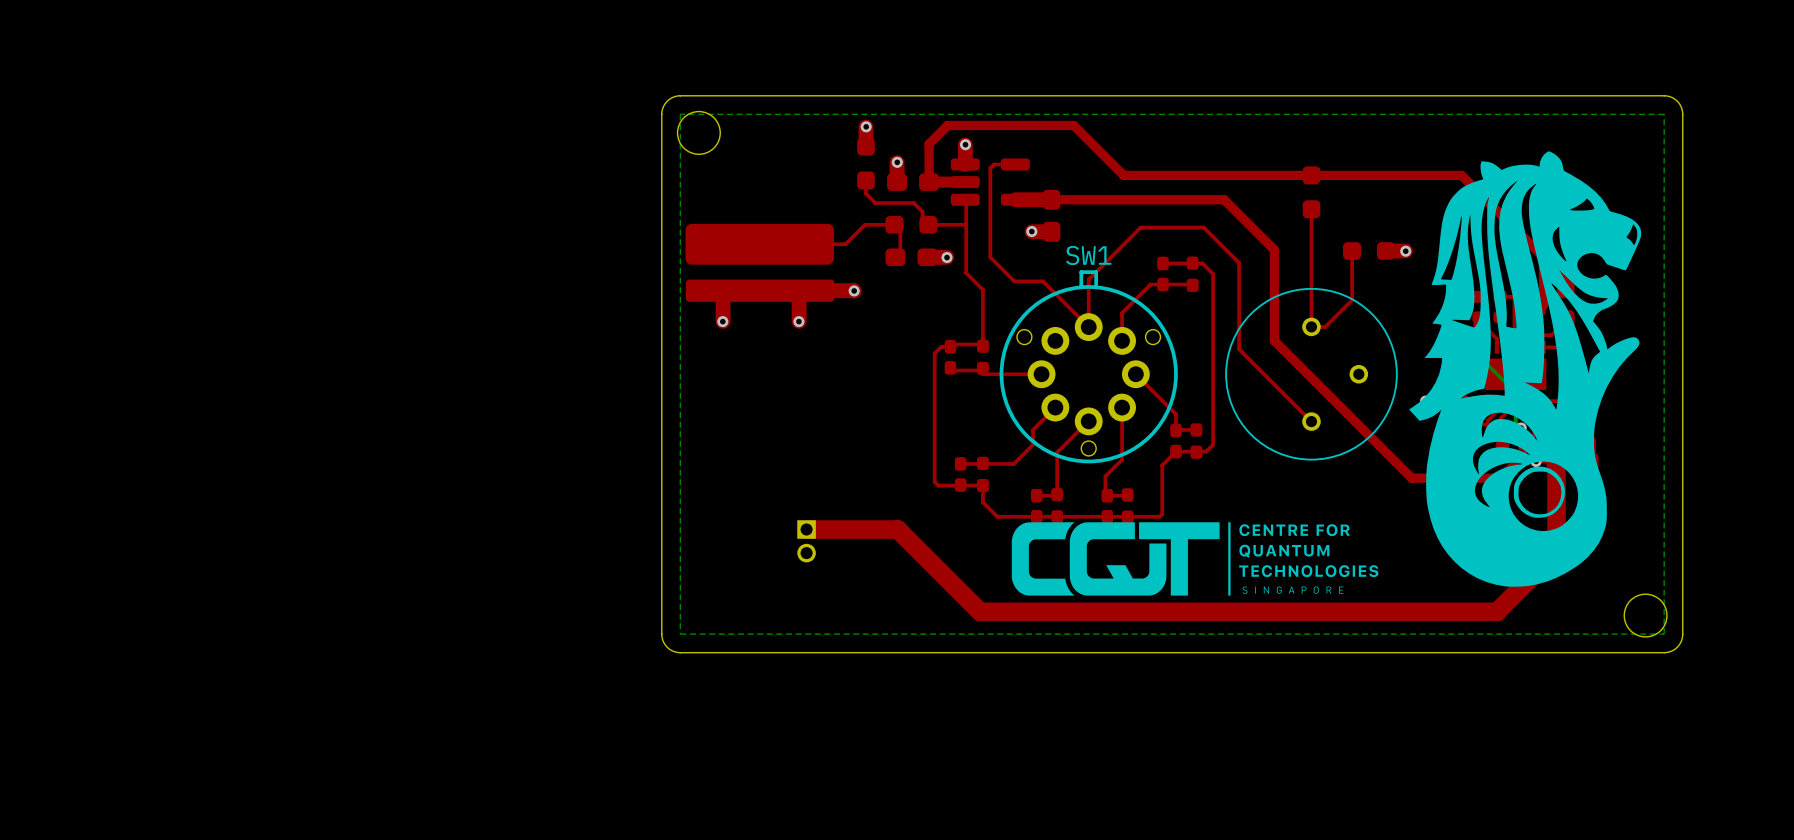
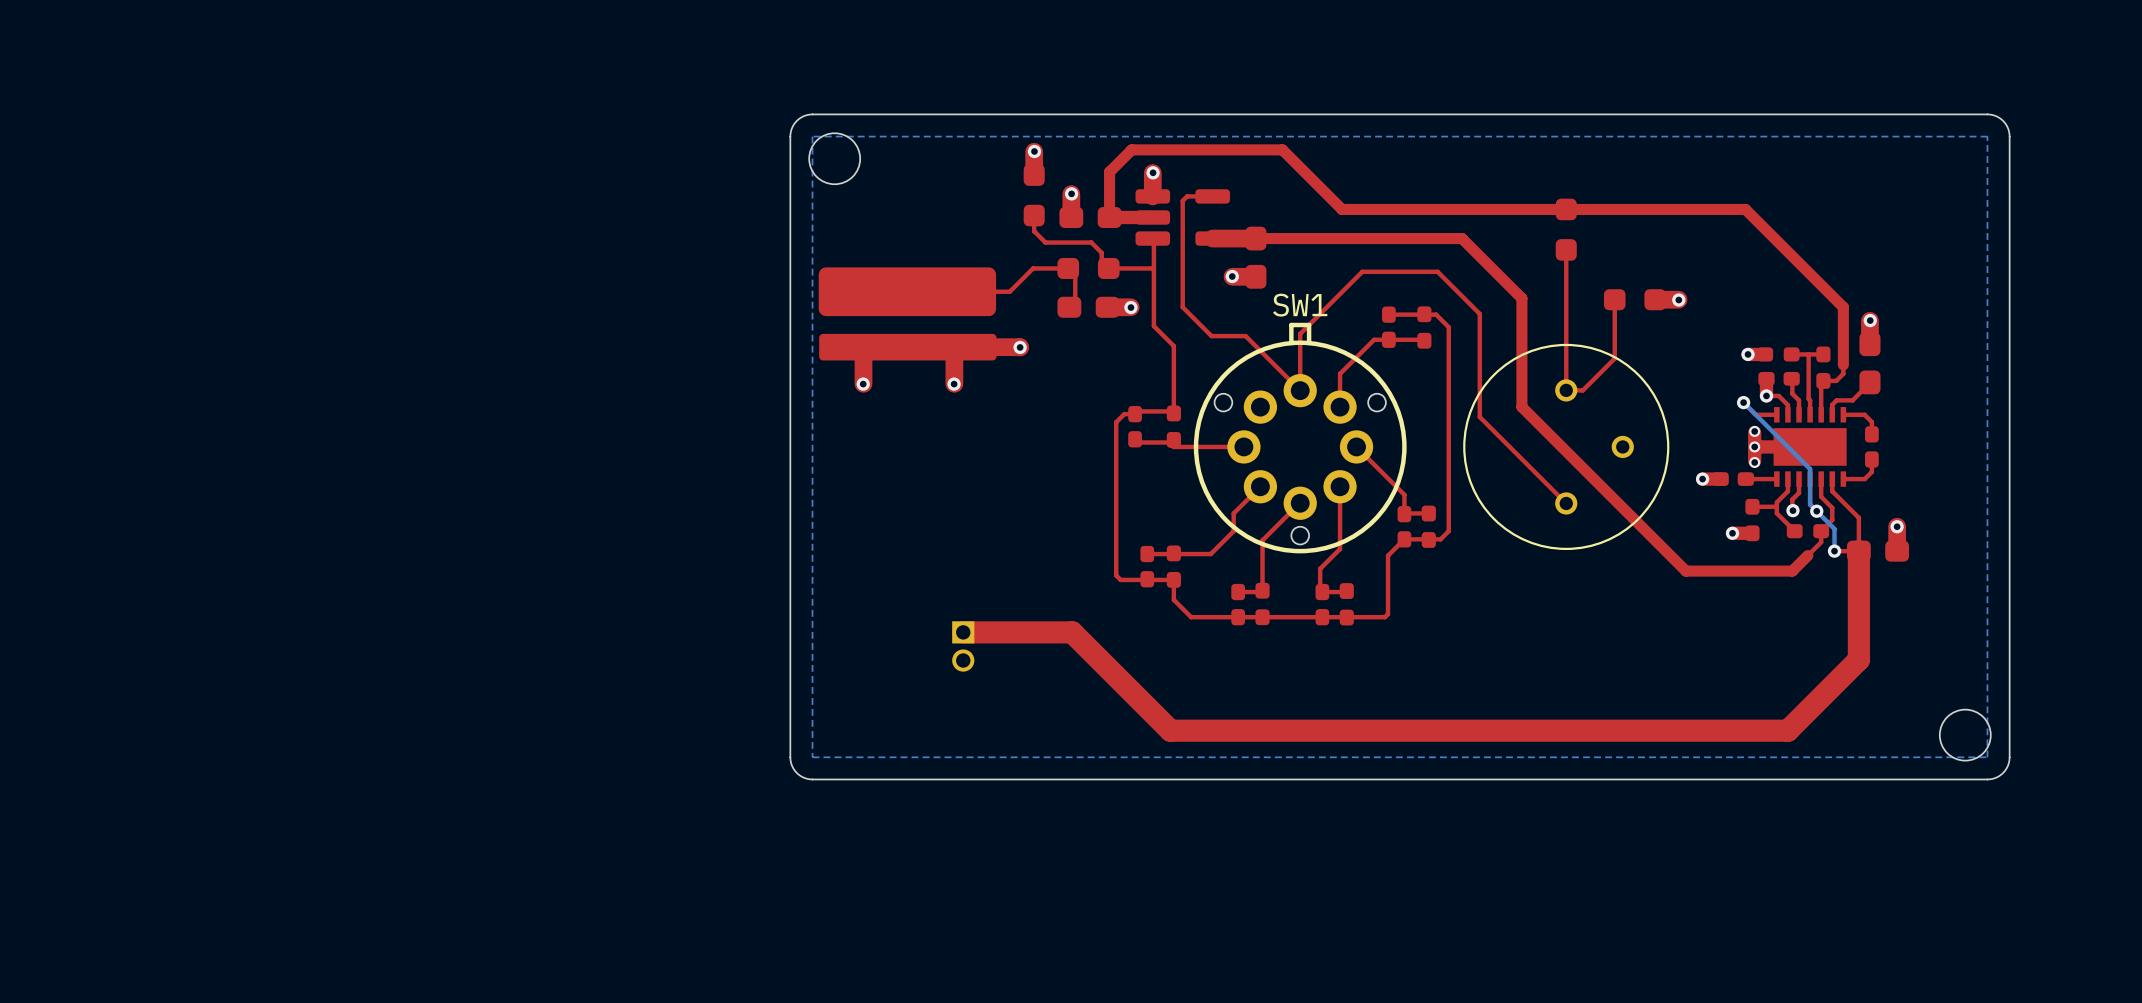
drawing: [1409, 151, 1642, 587] -> none
drawing: [1011, 522, 1379, 596] -> none

